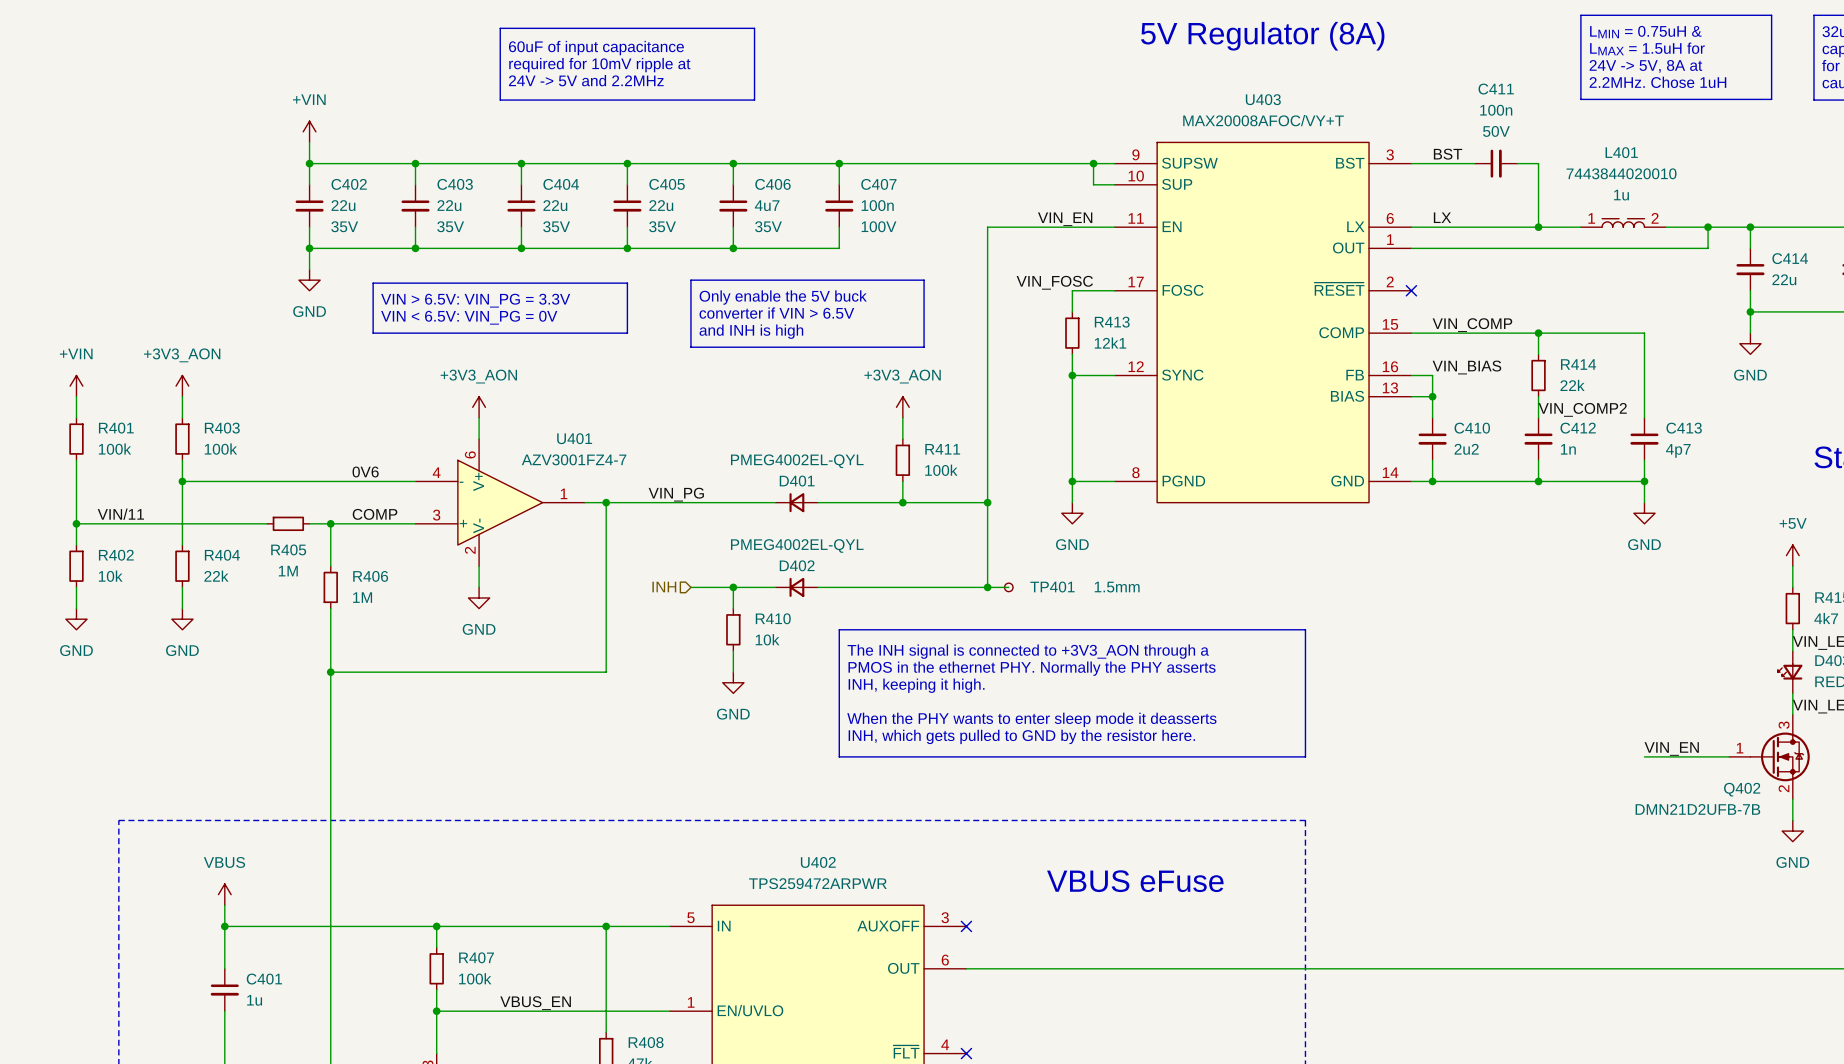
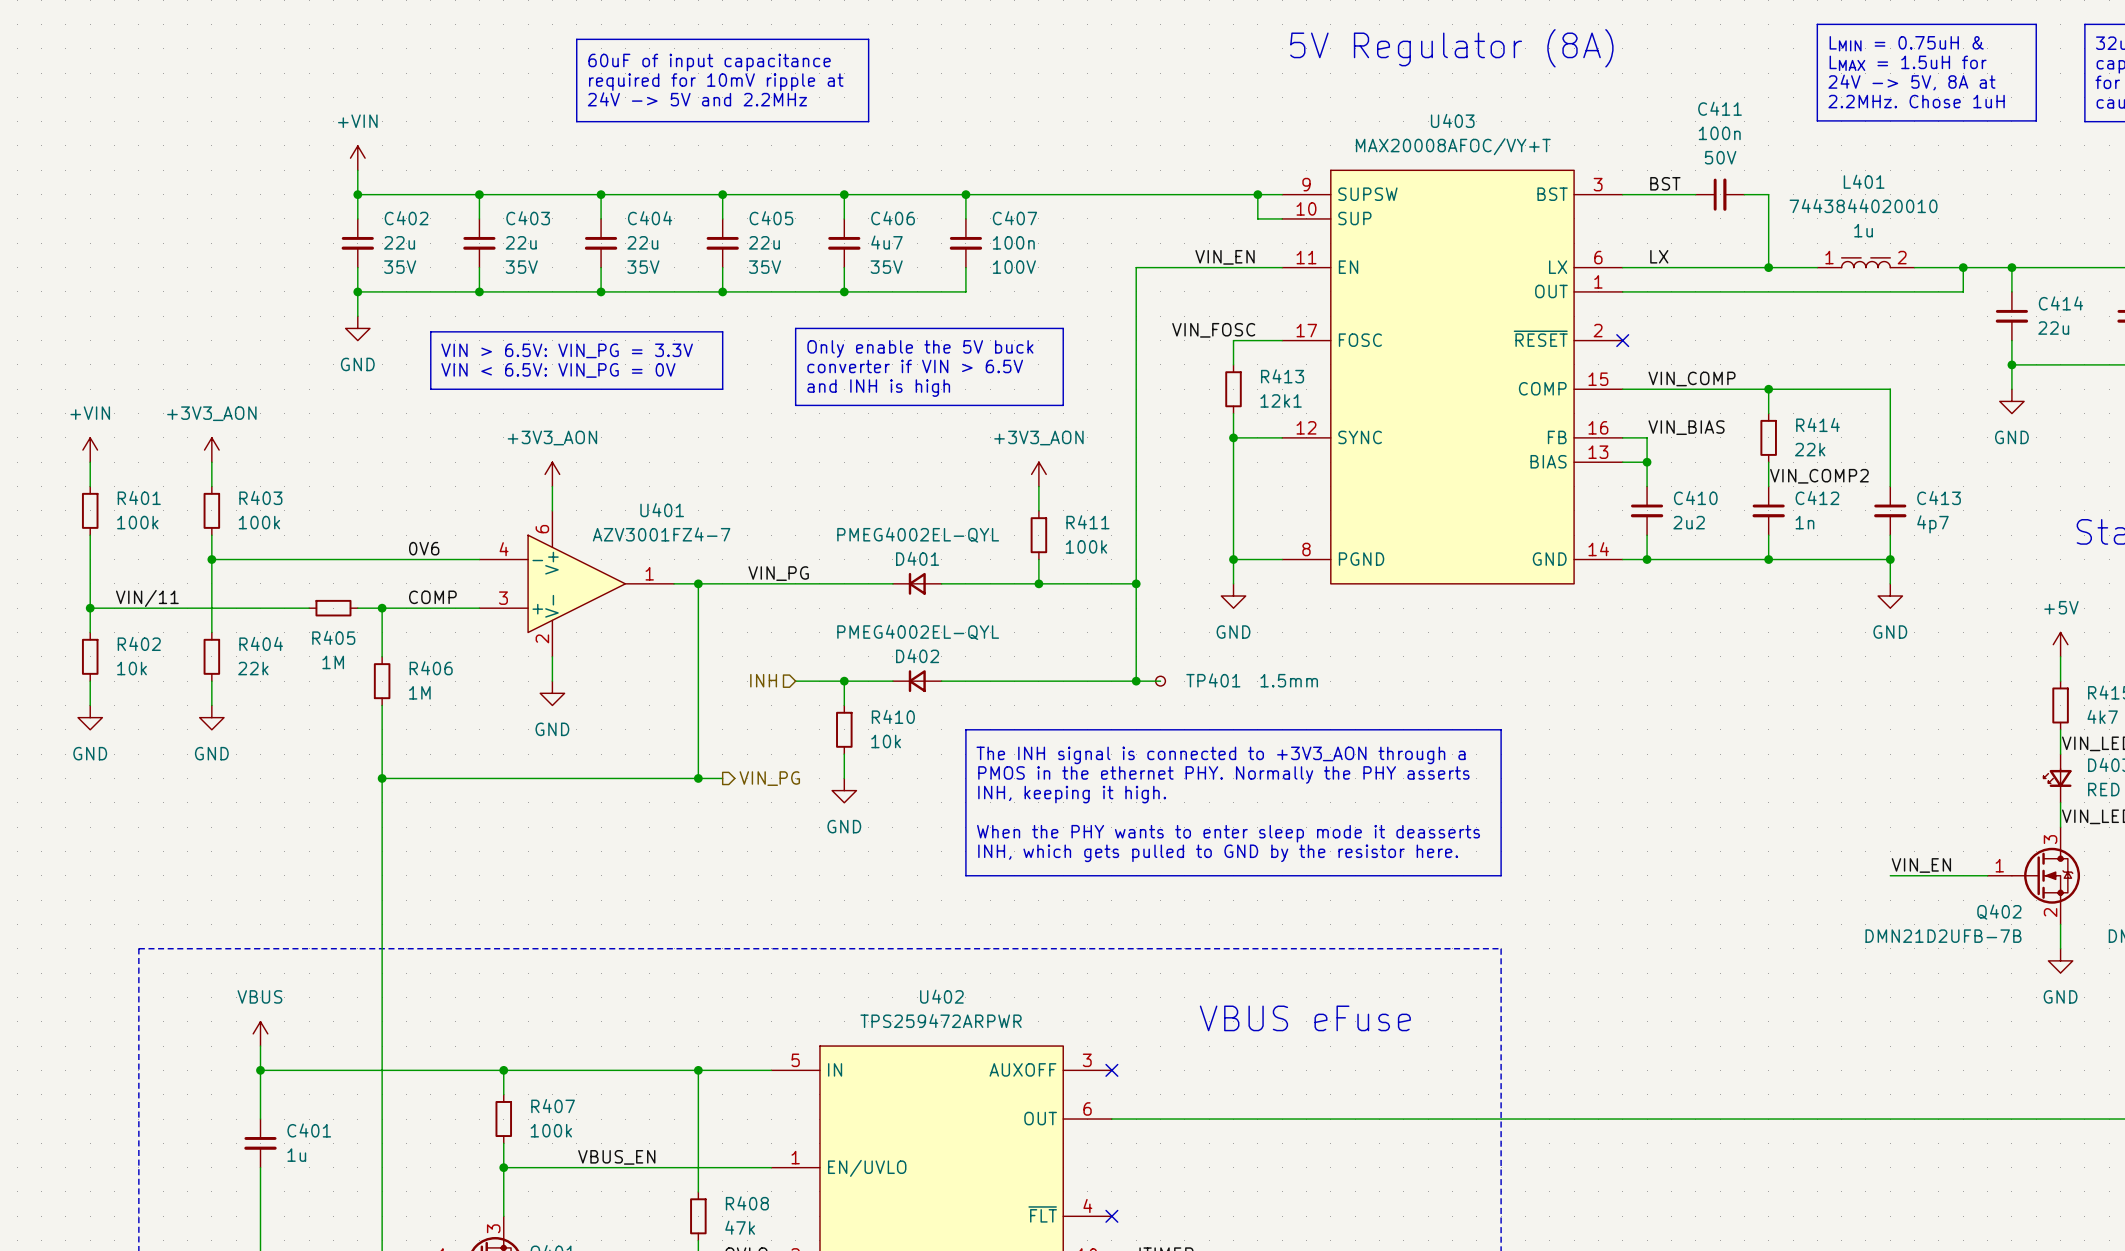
wire: none -> (698, 778) (722, 778)
junction: none -> (698, 778)
hierarchical label: none -> VIN_PG (769, 778)

